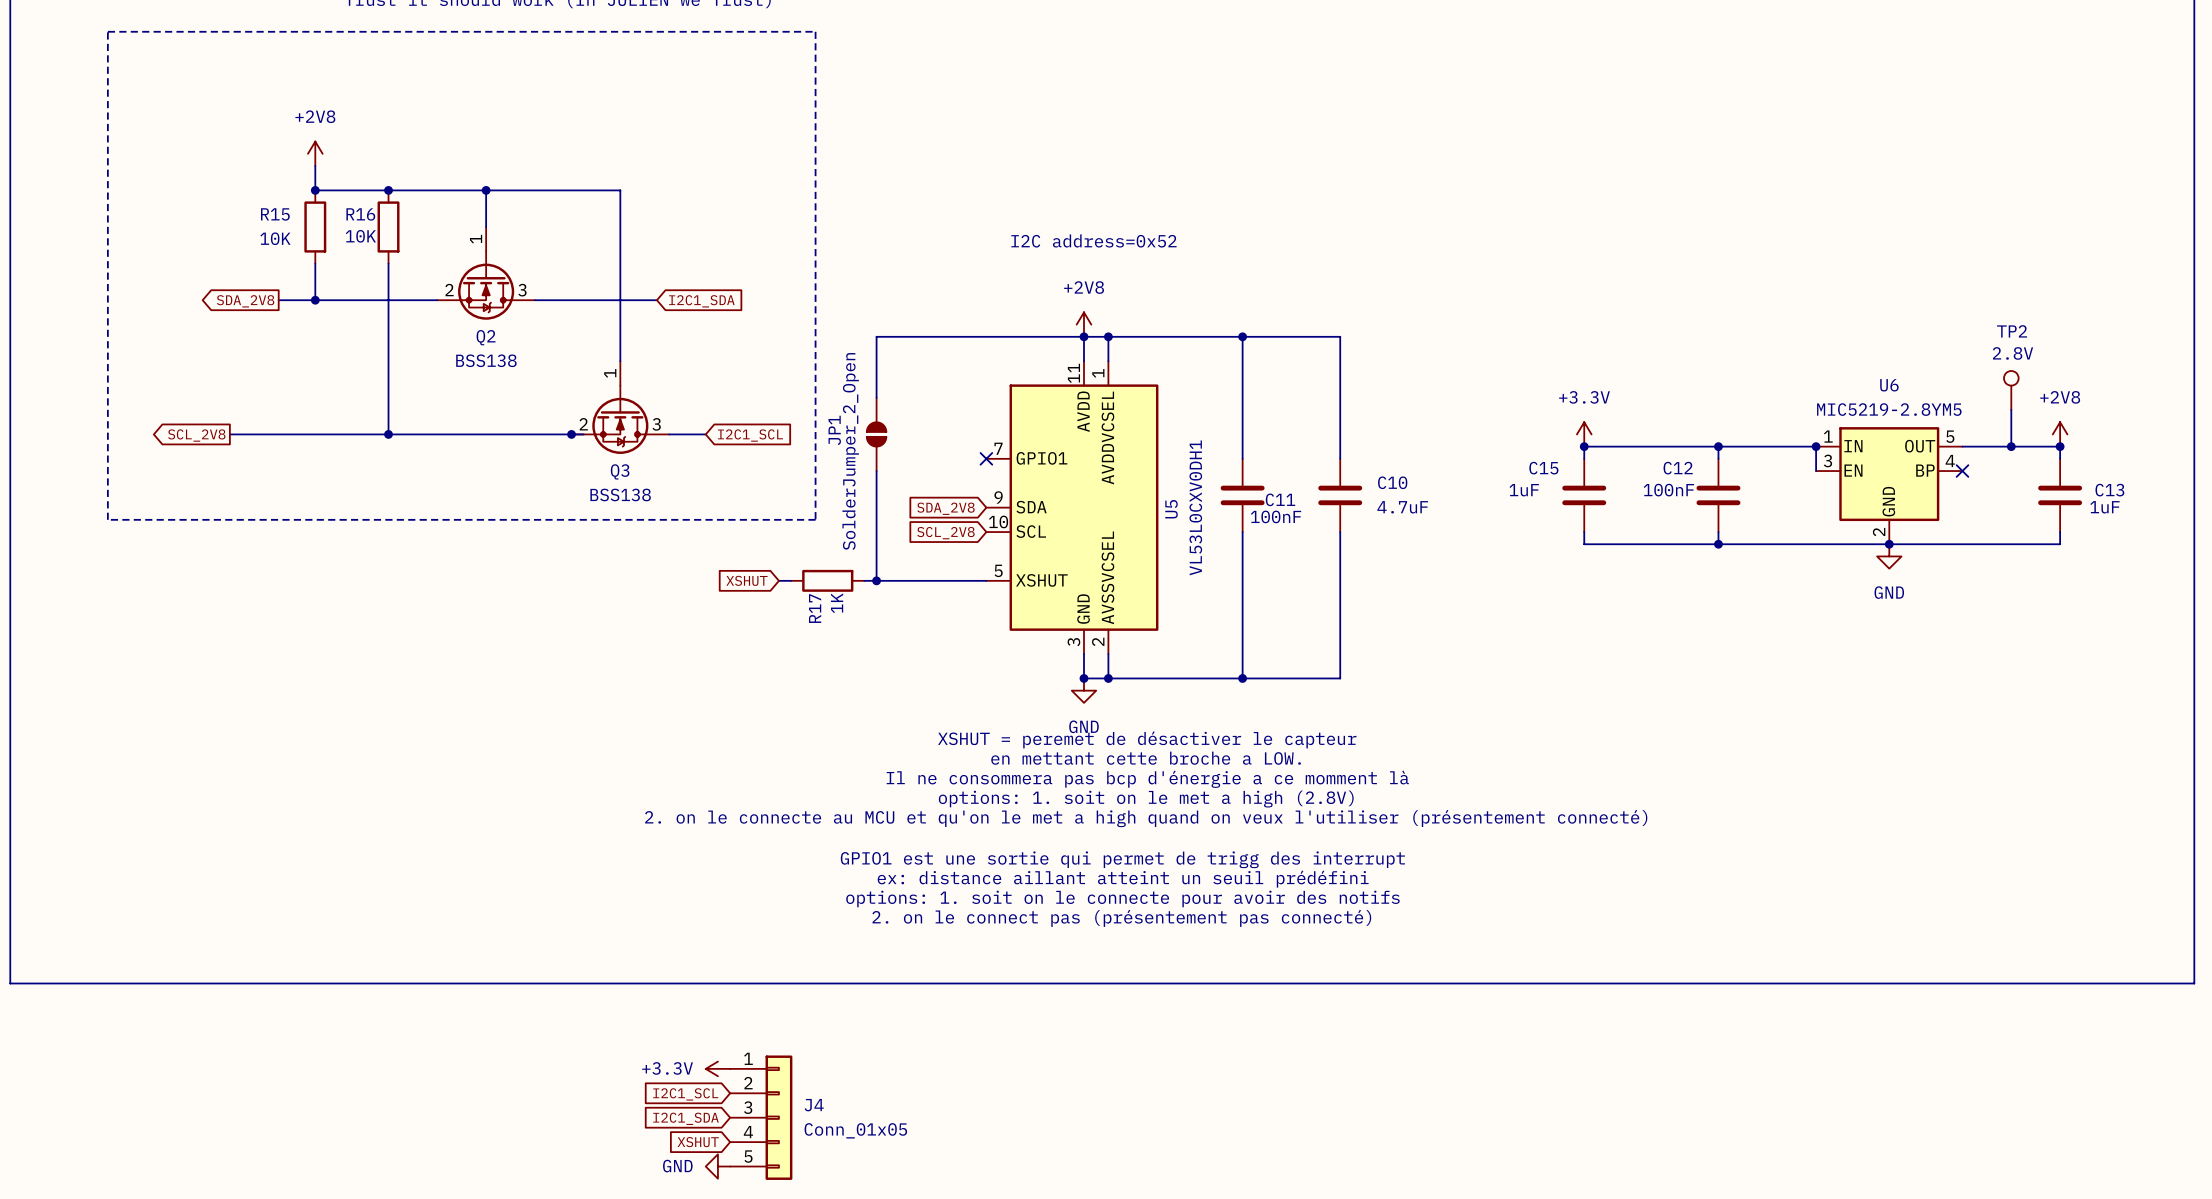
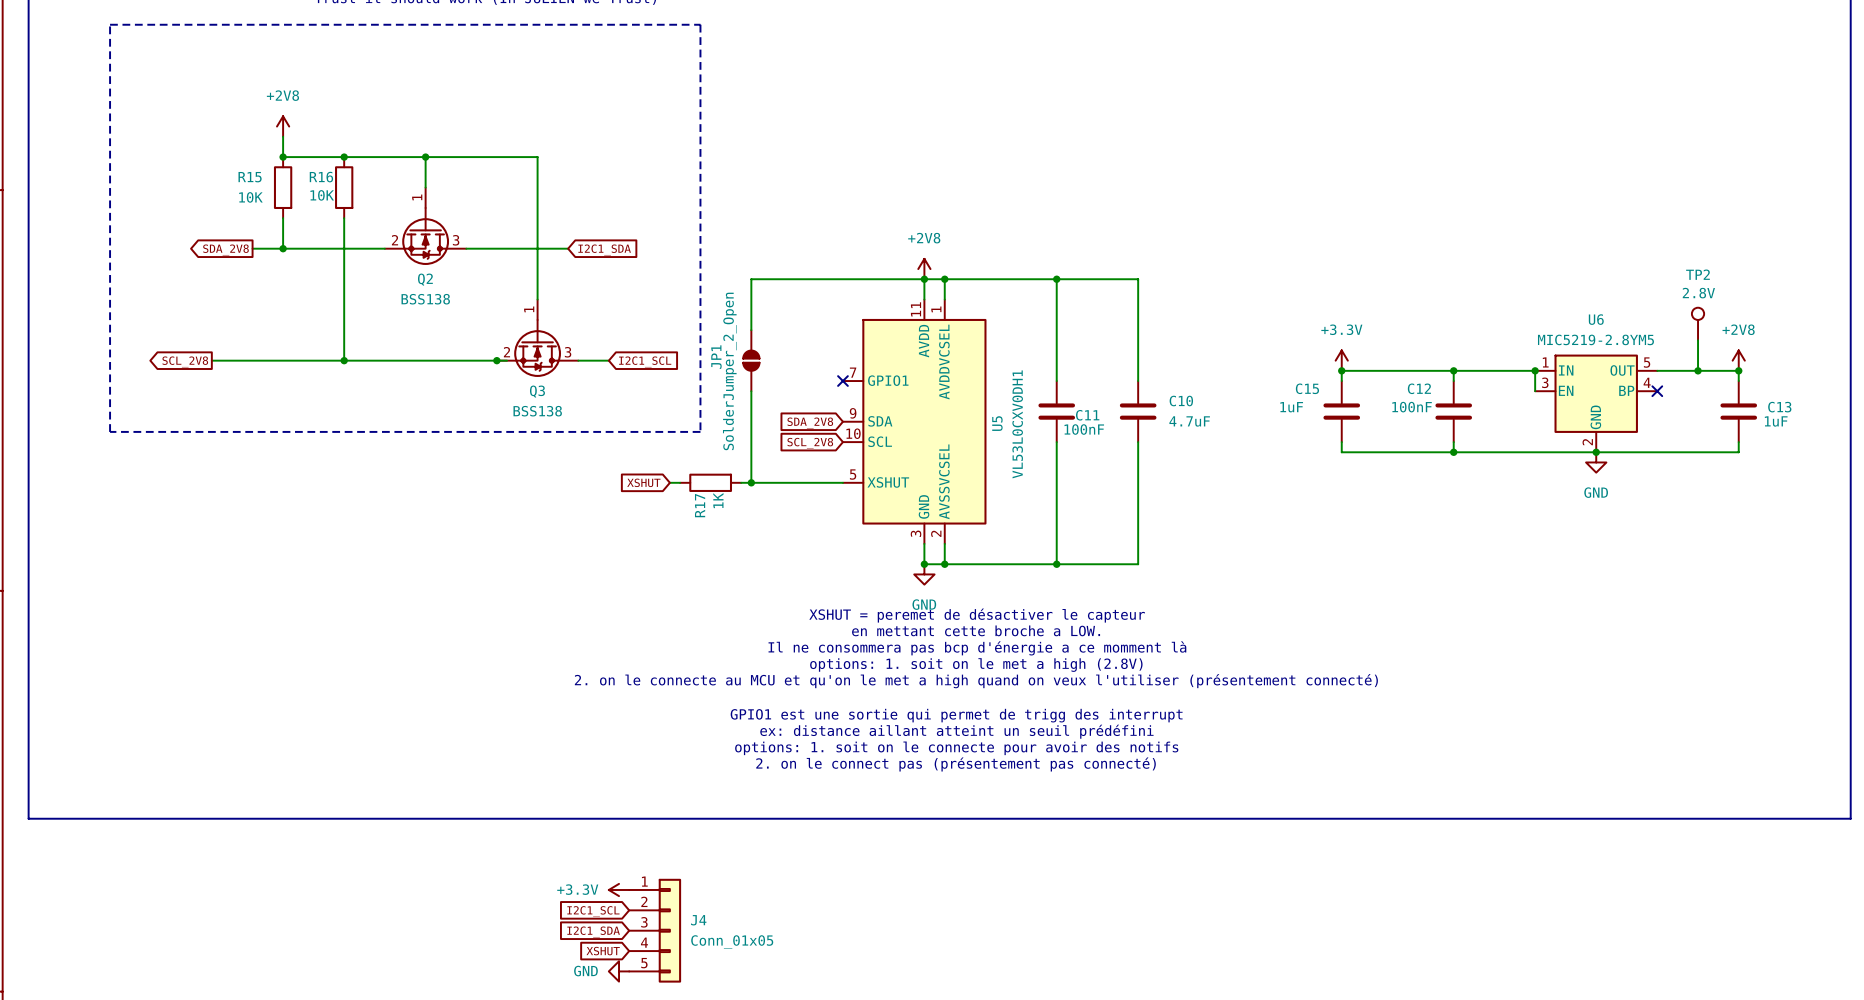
text: I2C address=0x52 (1093, 240) -> none

